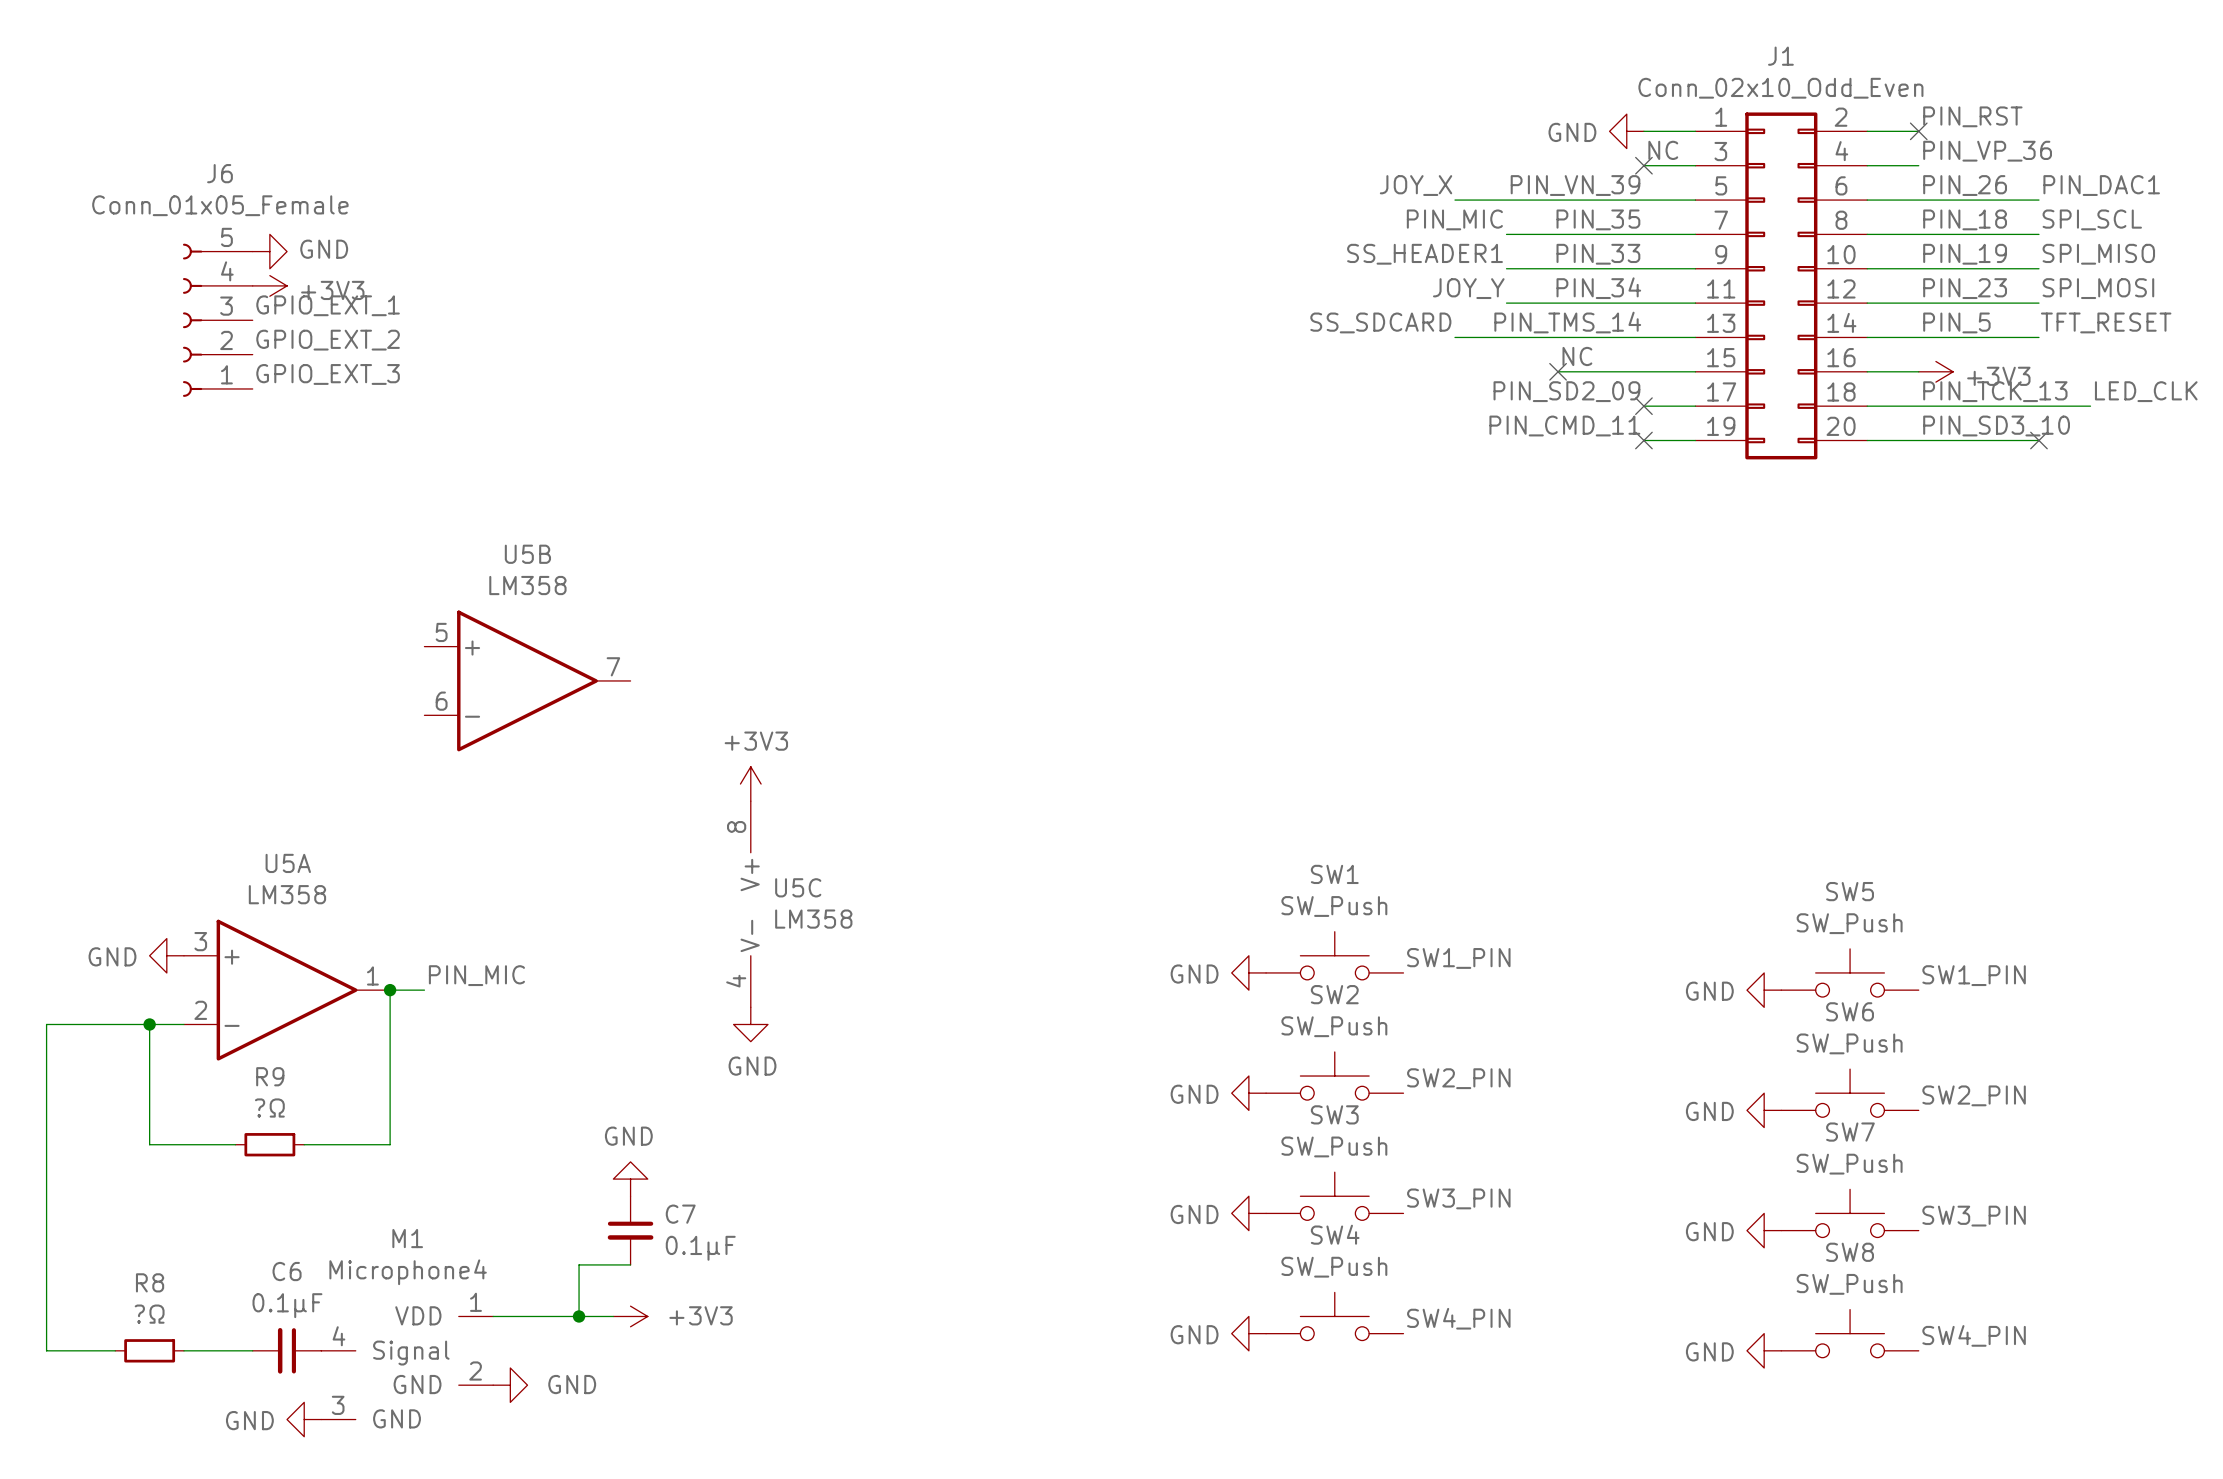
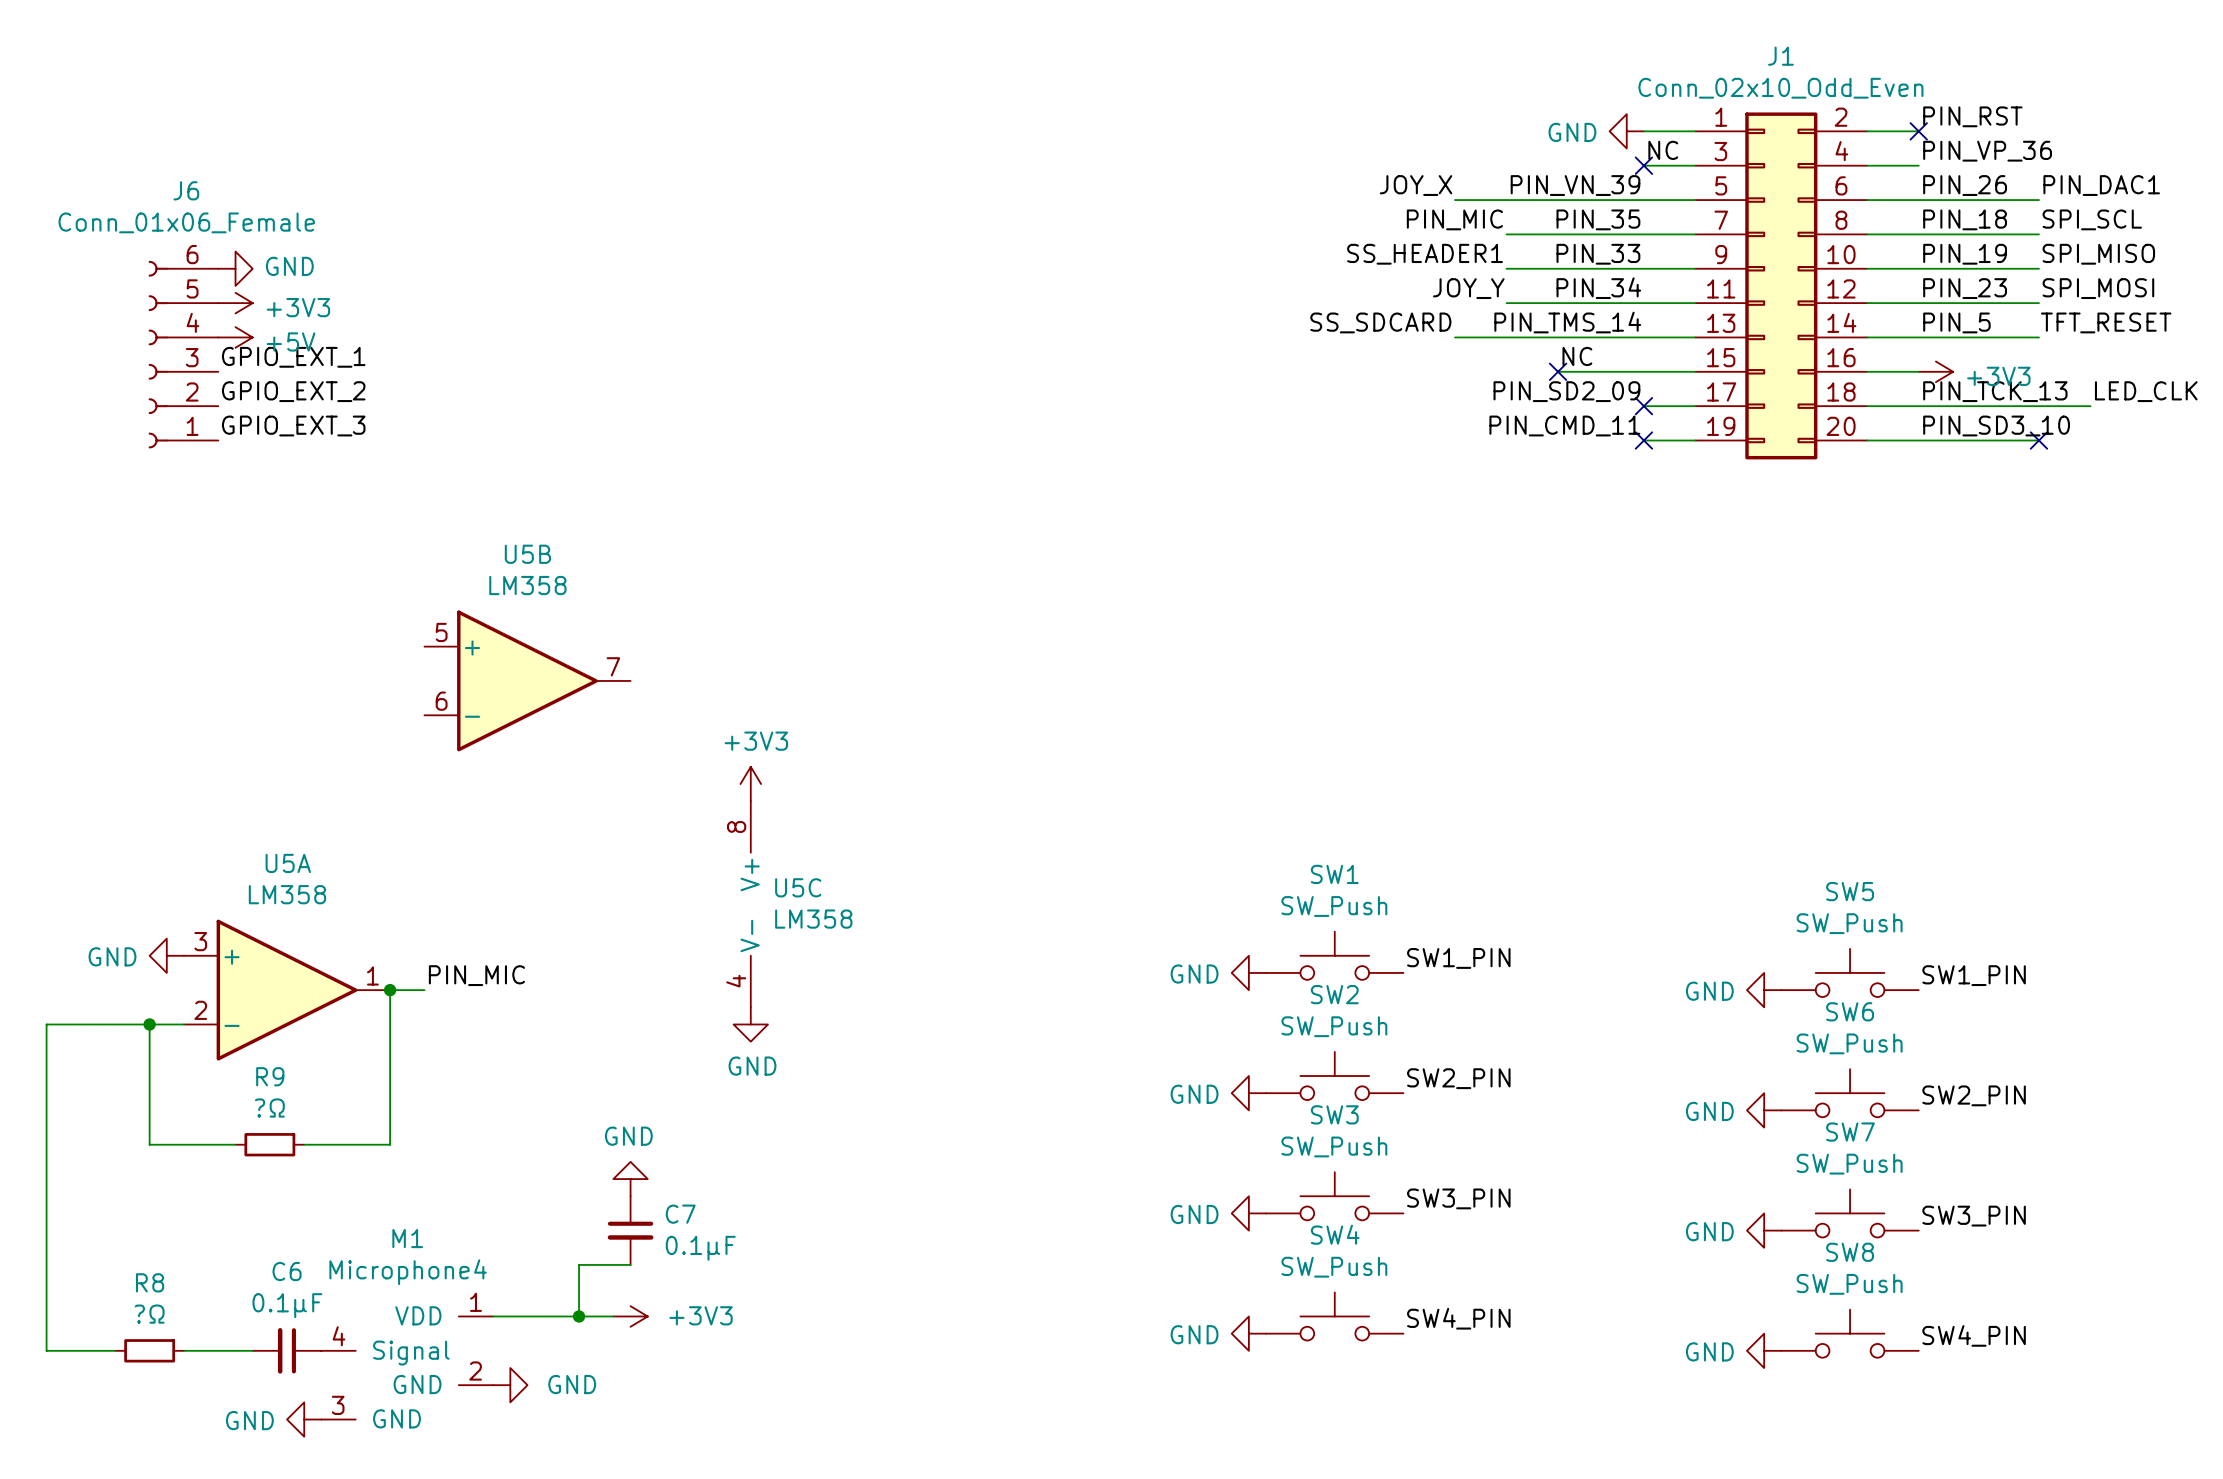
J6 value: Conn_01x05_Female (220, 205) -> Conn_01x06_Female (186, 222)
J6 symbol: [182, 243, 253, 397] -> [148, 260, 219, 449]
power symbol position: GND (269, 251) -> GND (235, 268)
power symbol position: +3V3 (269, 285) -> +3V3 (235, 303)
label position: GPIO_EXT_1 (328, 305) -> GPIO_EXT_1 (293, 357)
power symbol: none -> +5V (235, 337)
label position: GPIO_EXT_2 (328, 340) -> GPIO_EXT_2 (293, 391)
label position: GPIO_EXT_3 (328, 374) -> GPIO_EXT_3 (293, 426)

